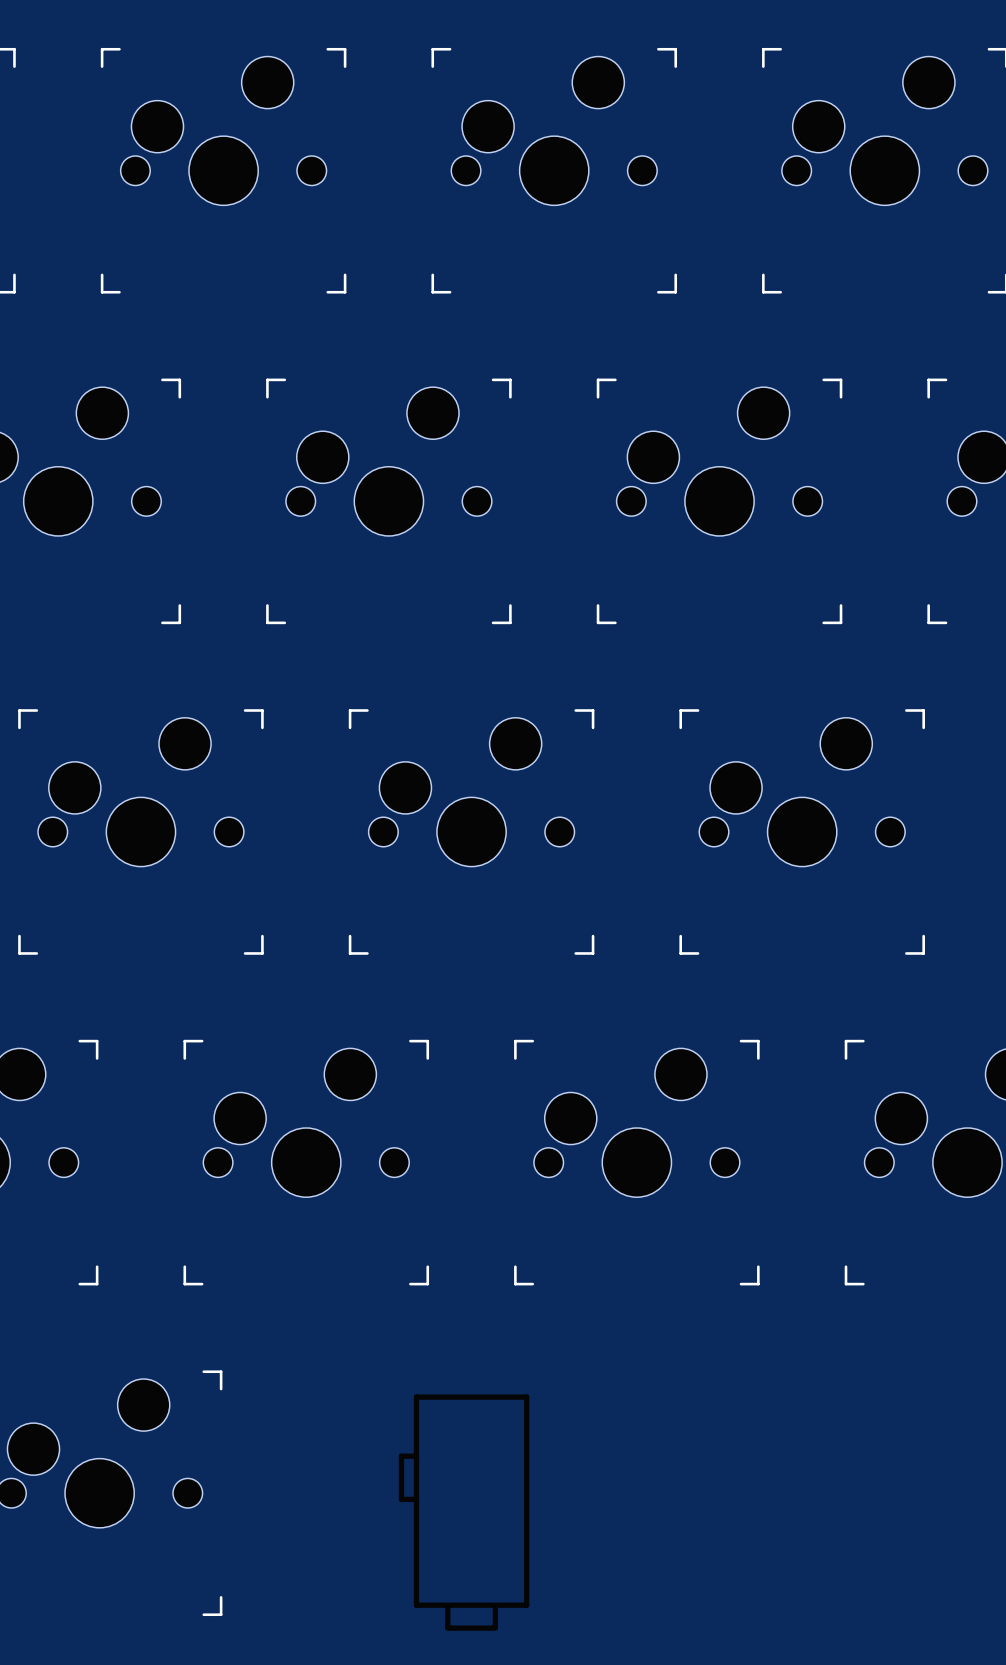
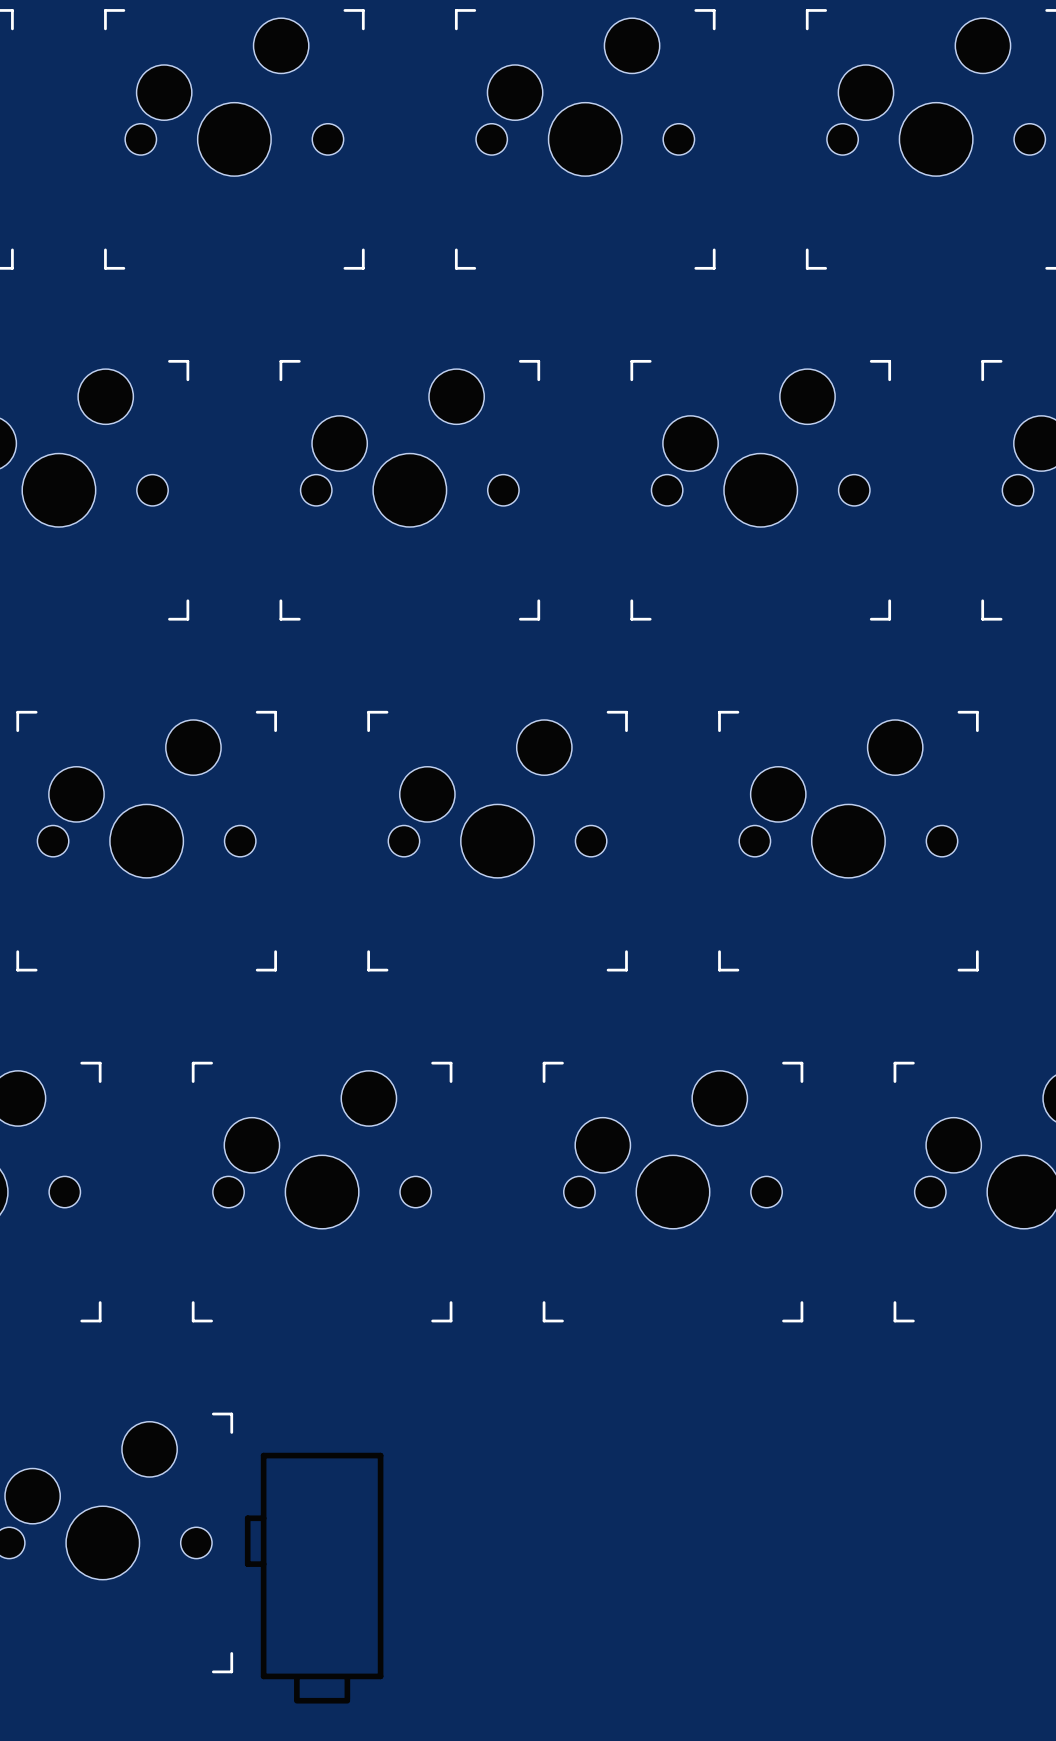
part position: (464, 1512) -> (314, 1578)

